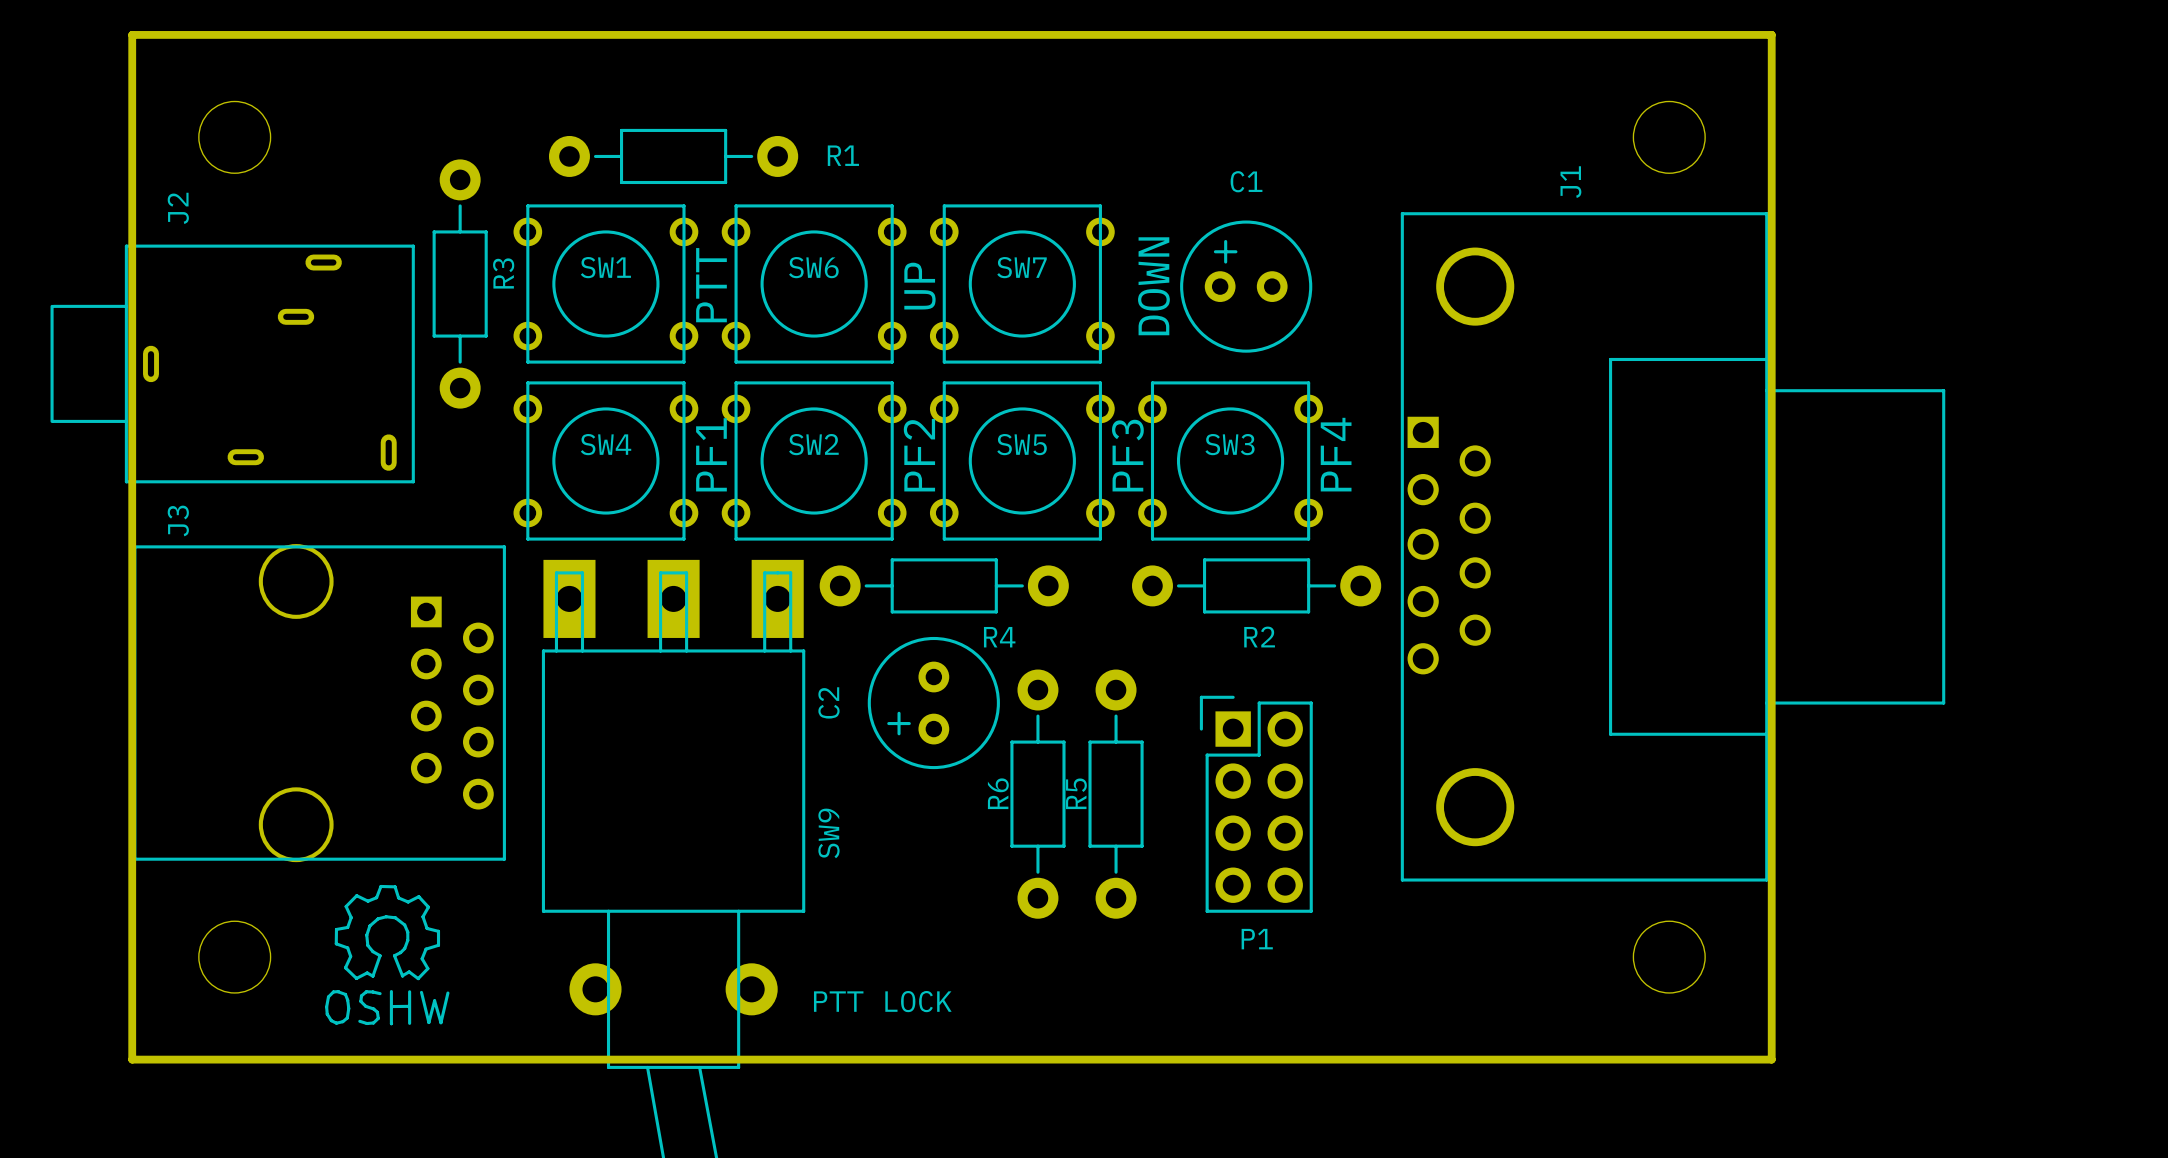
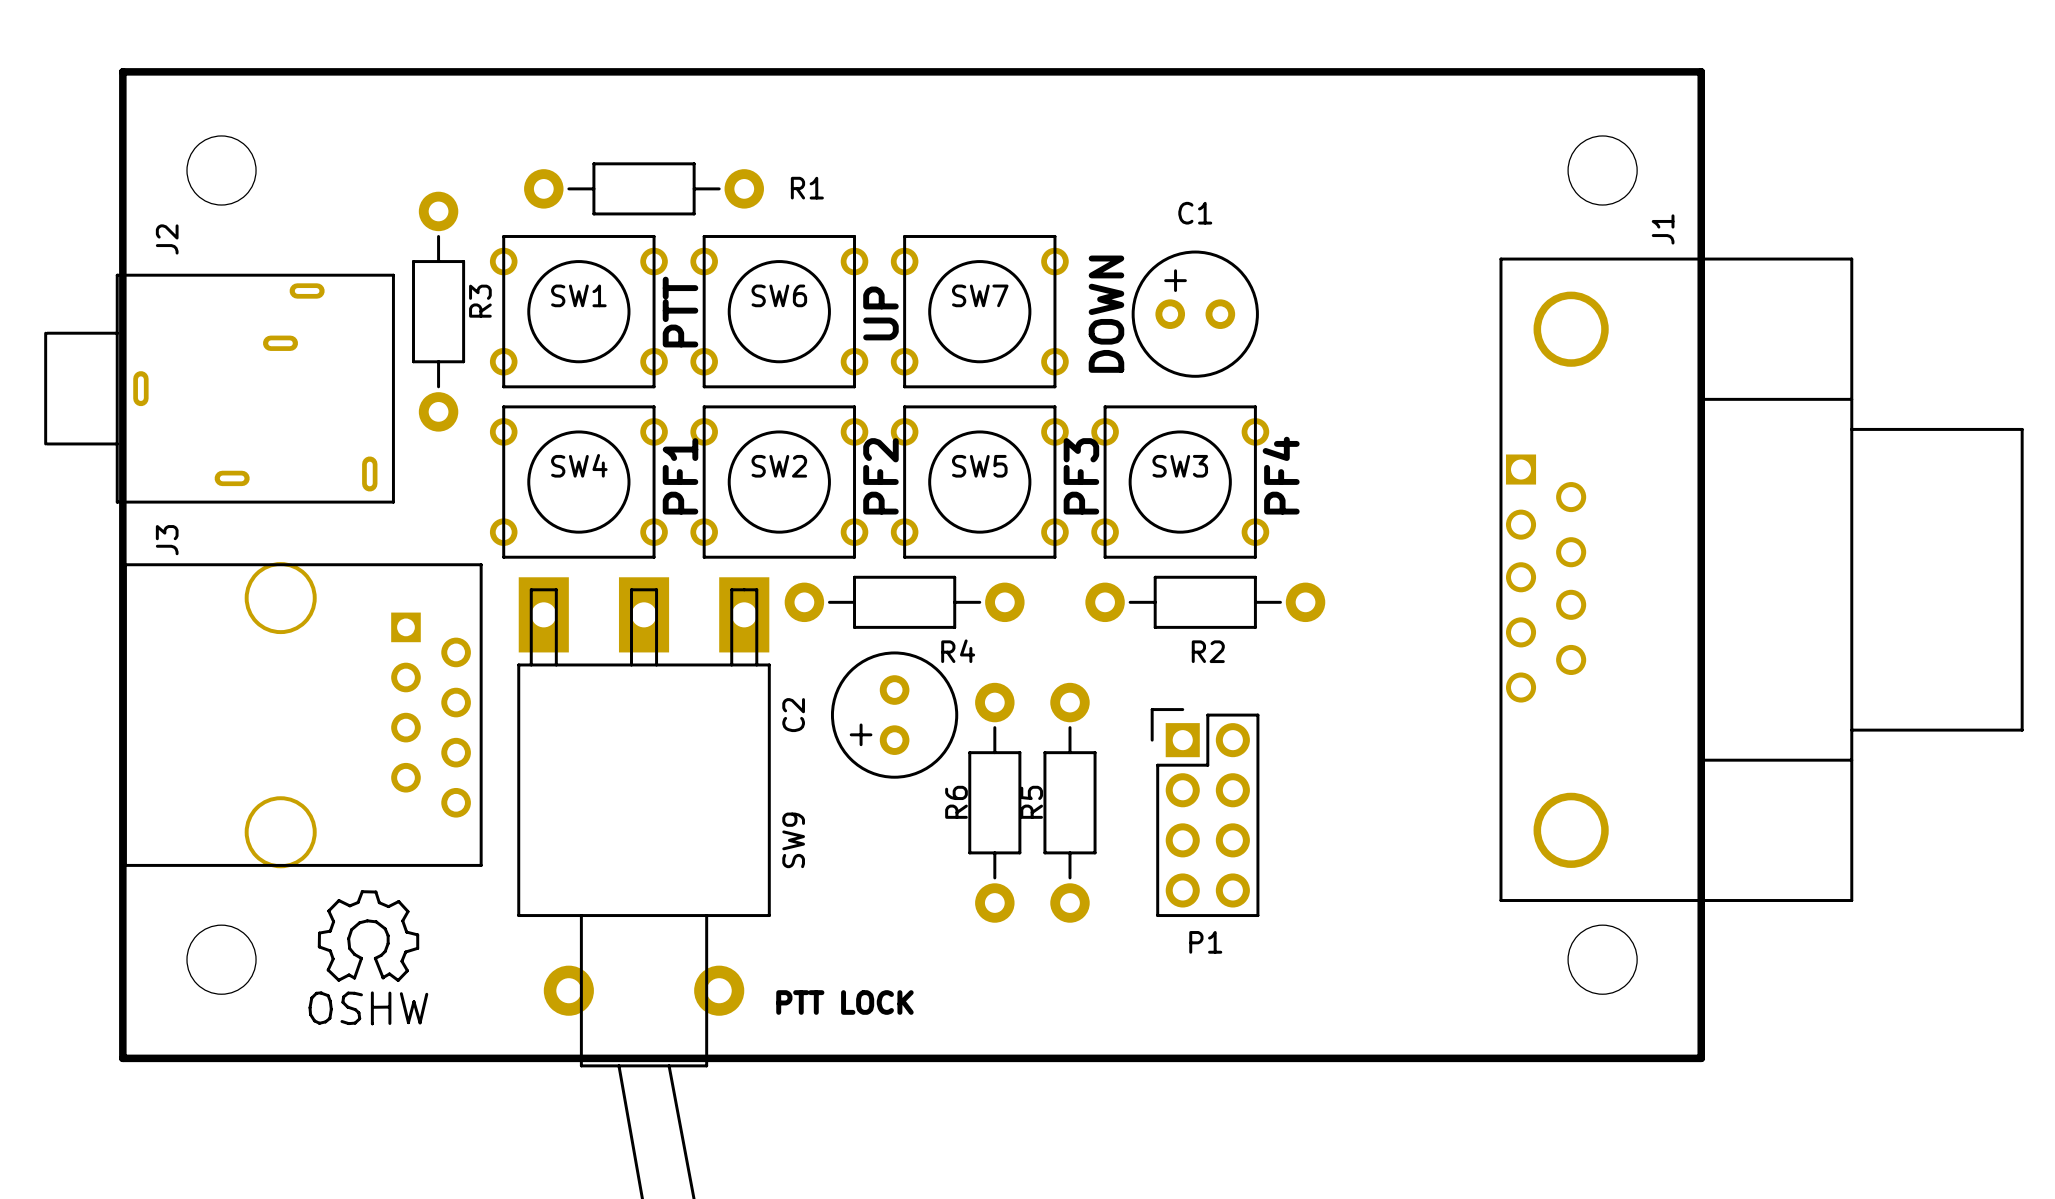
J1 position: (1673, 546) -> (1761, 579)

